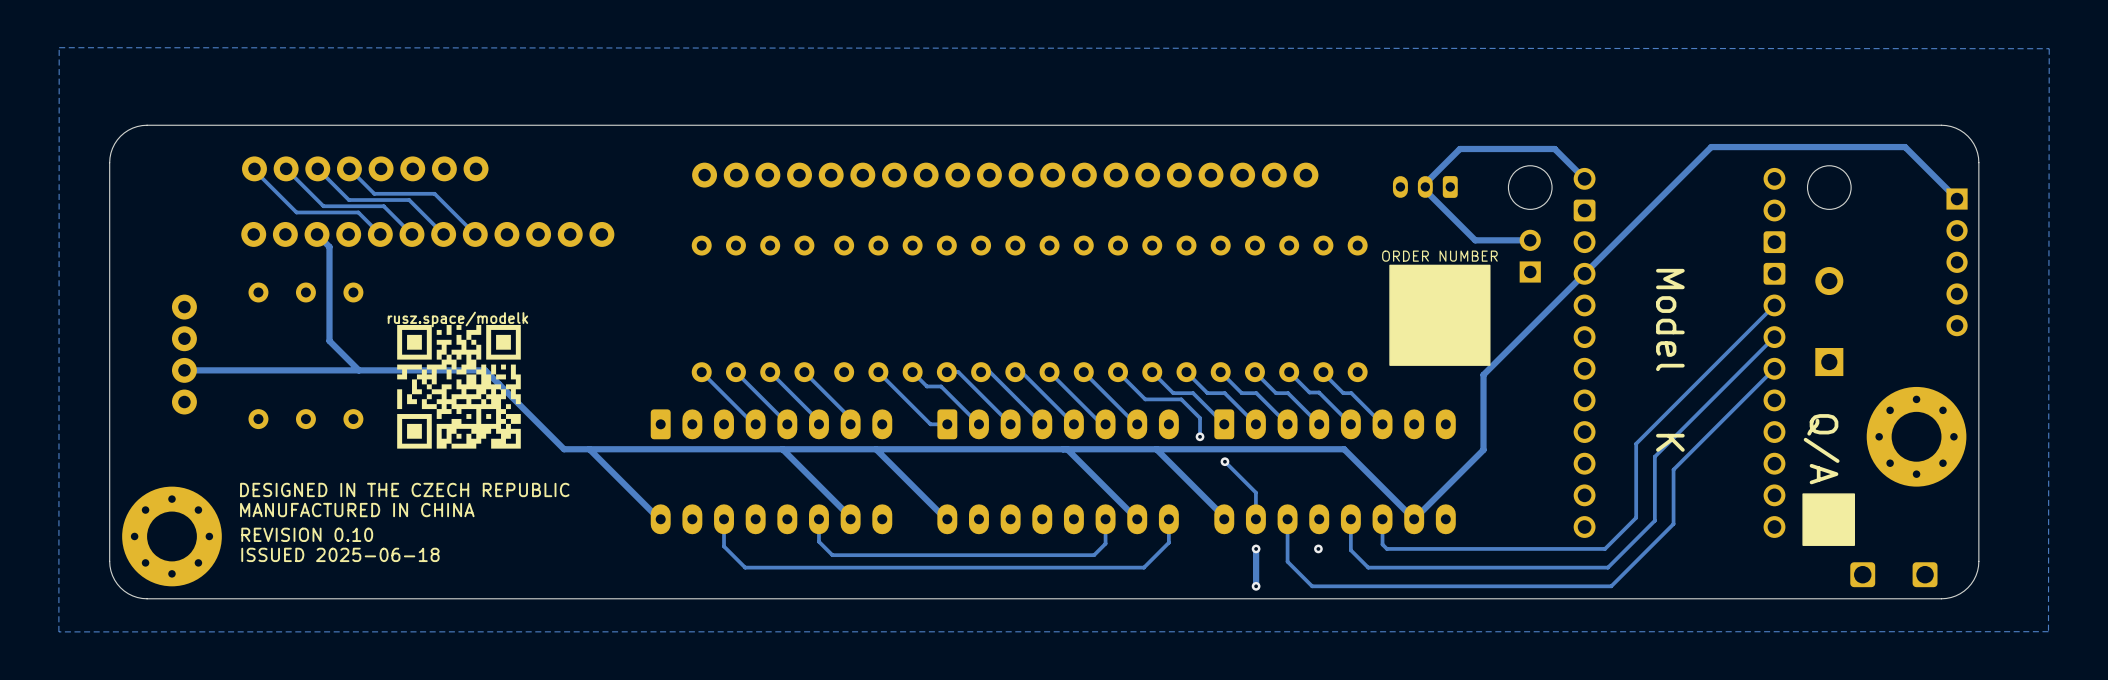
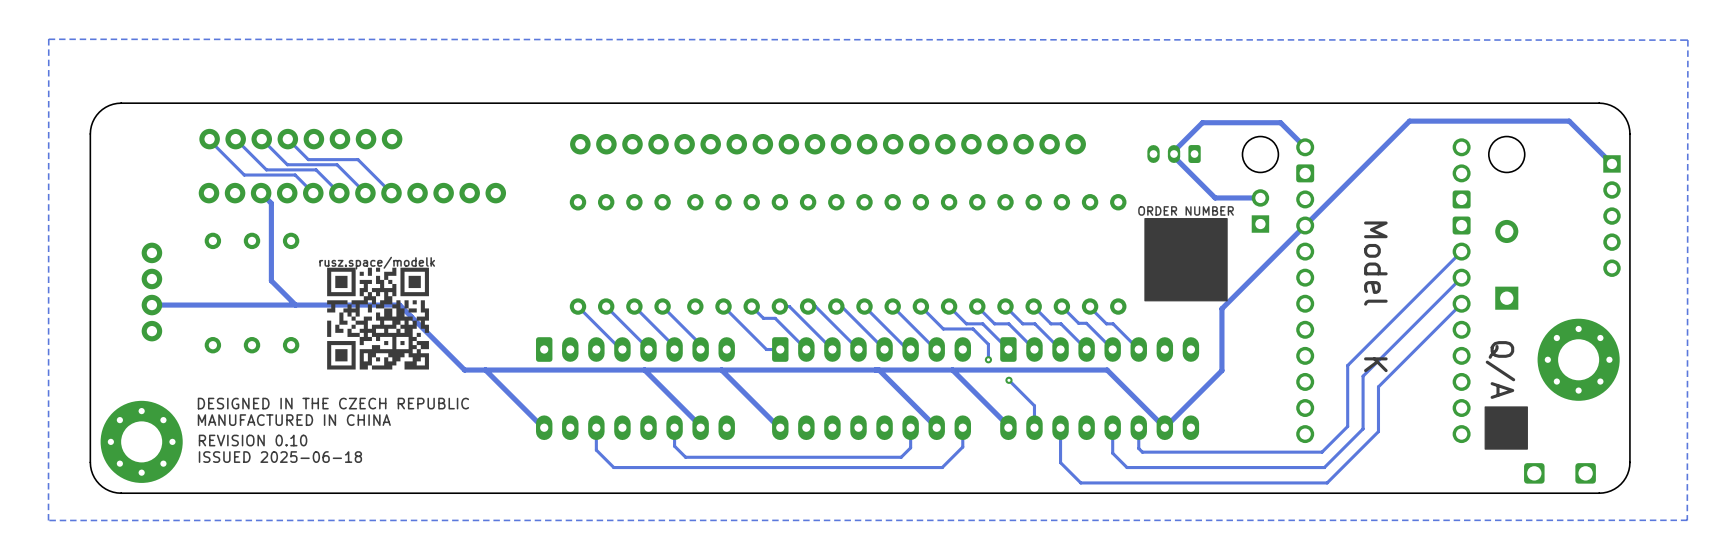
track: (1256, 548) (1256, 586) -> none
via: (1256, 548) -> none
via: (1318, 548) -> none
via: (1256, 586) -> none

